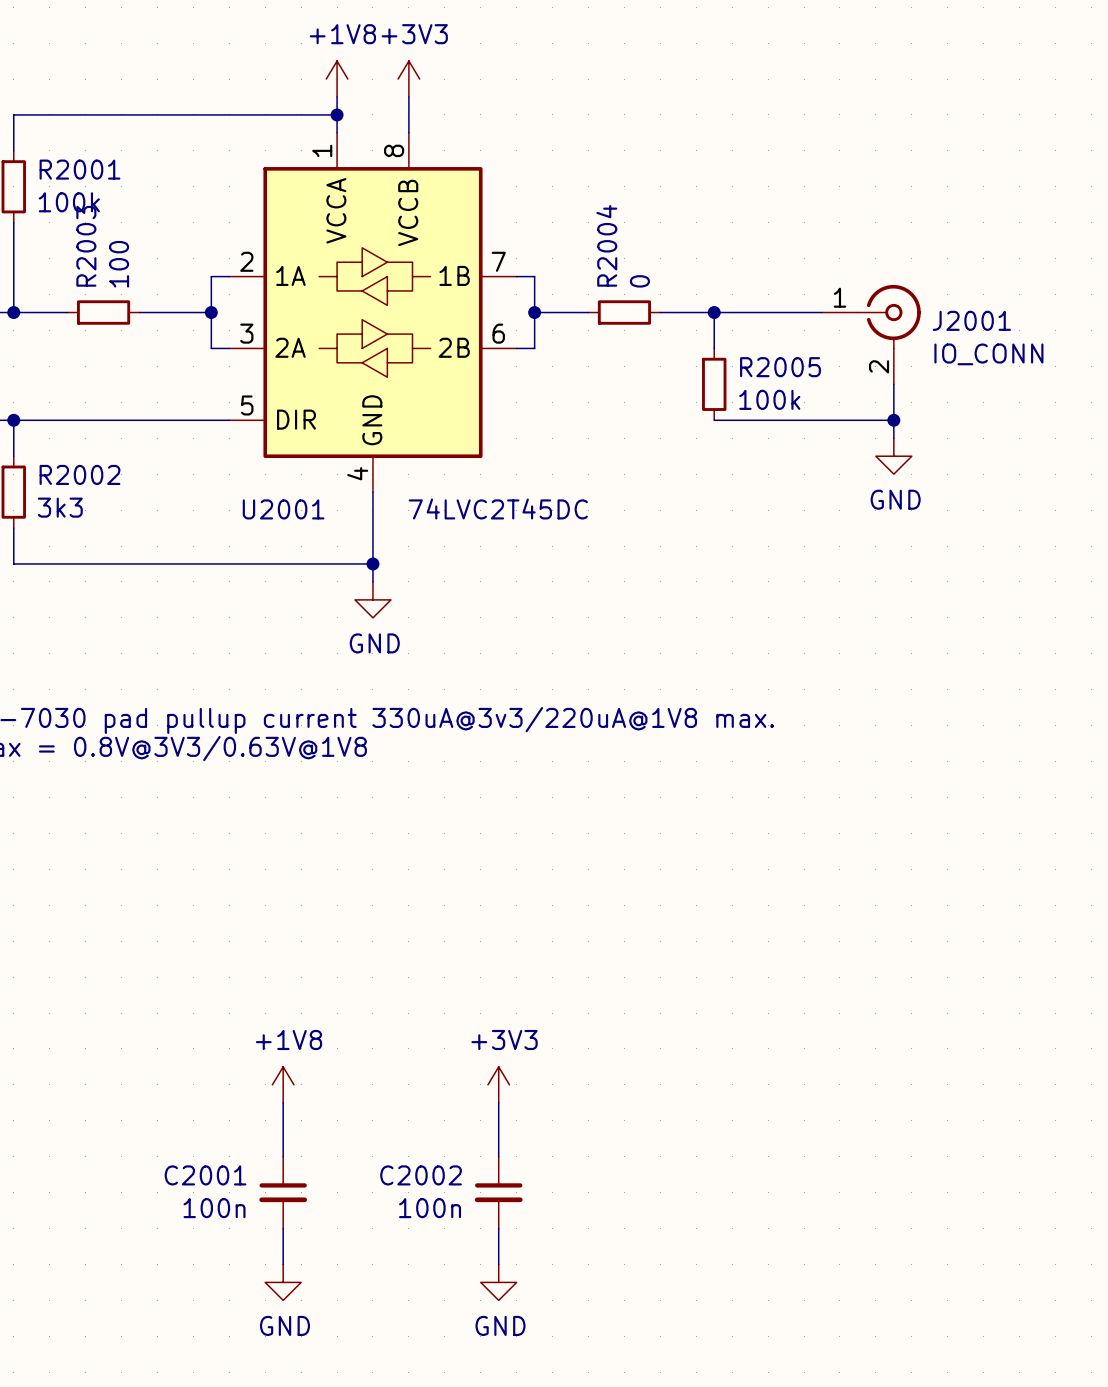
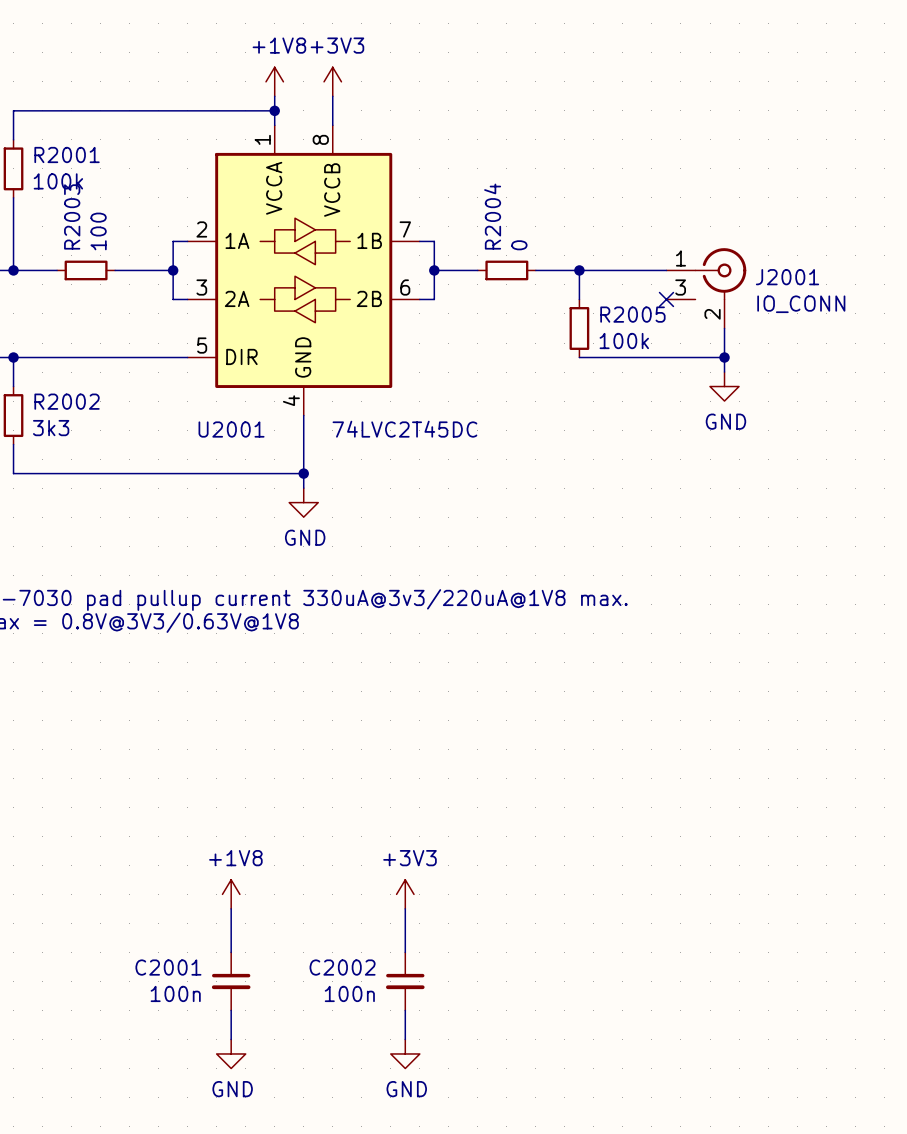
J2001 symbol: [822, 284, 921, 385] -> [666, 248, 747, 329]
no-connect mark: none -> (666, 299)

